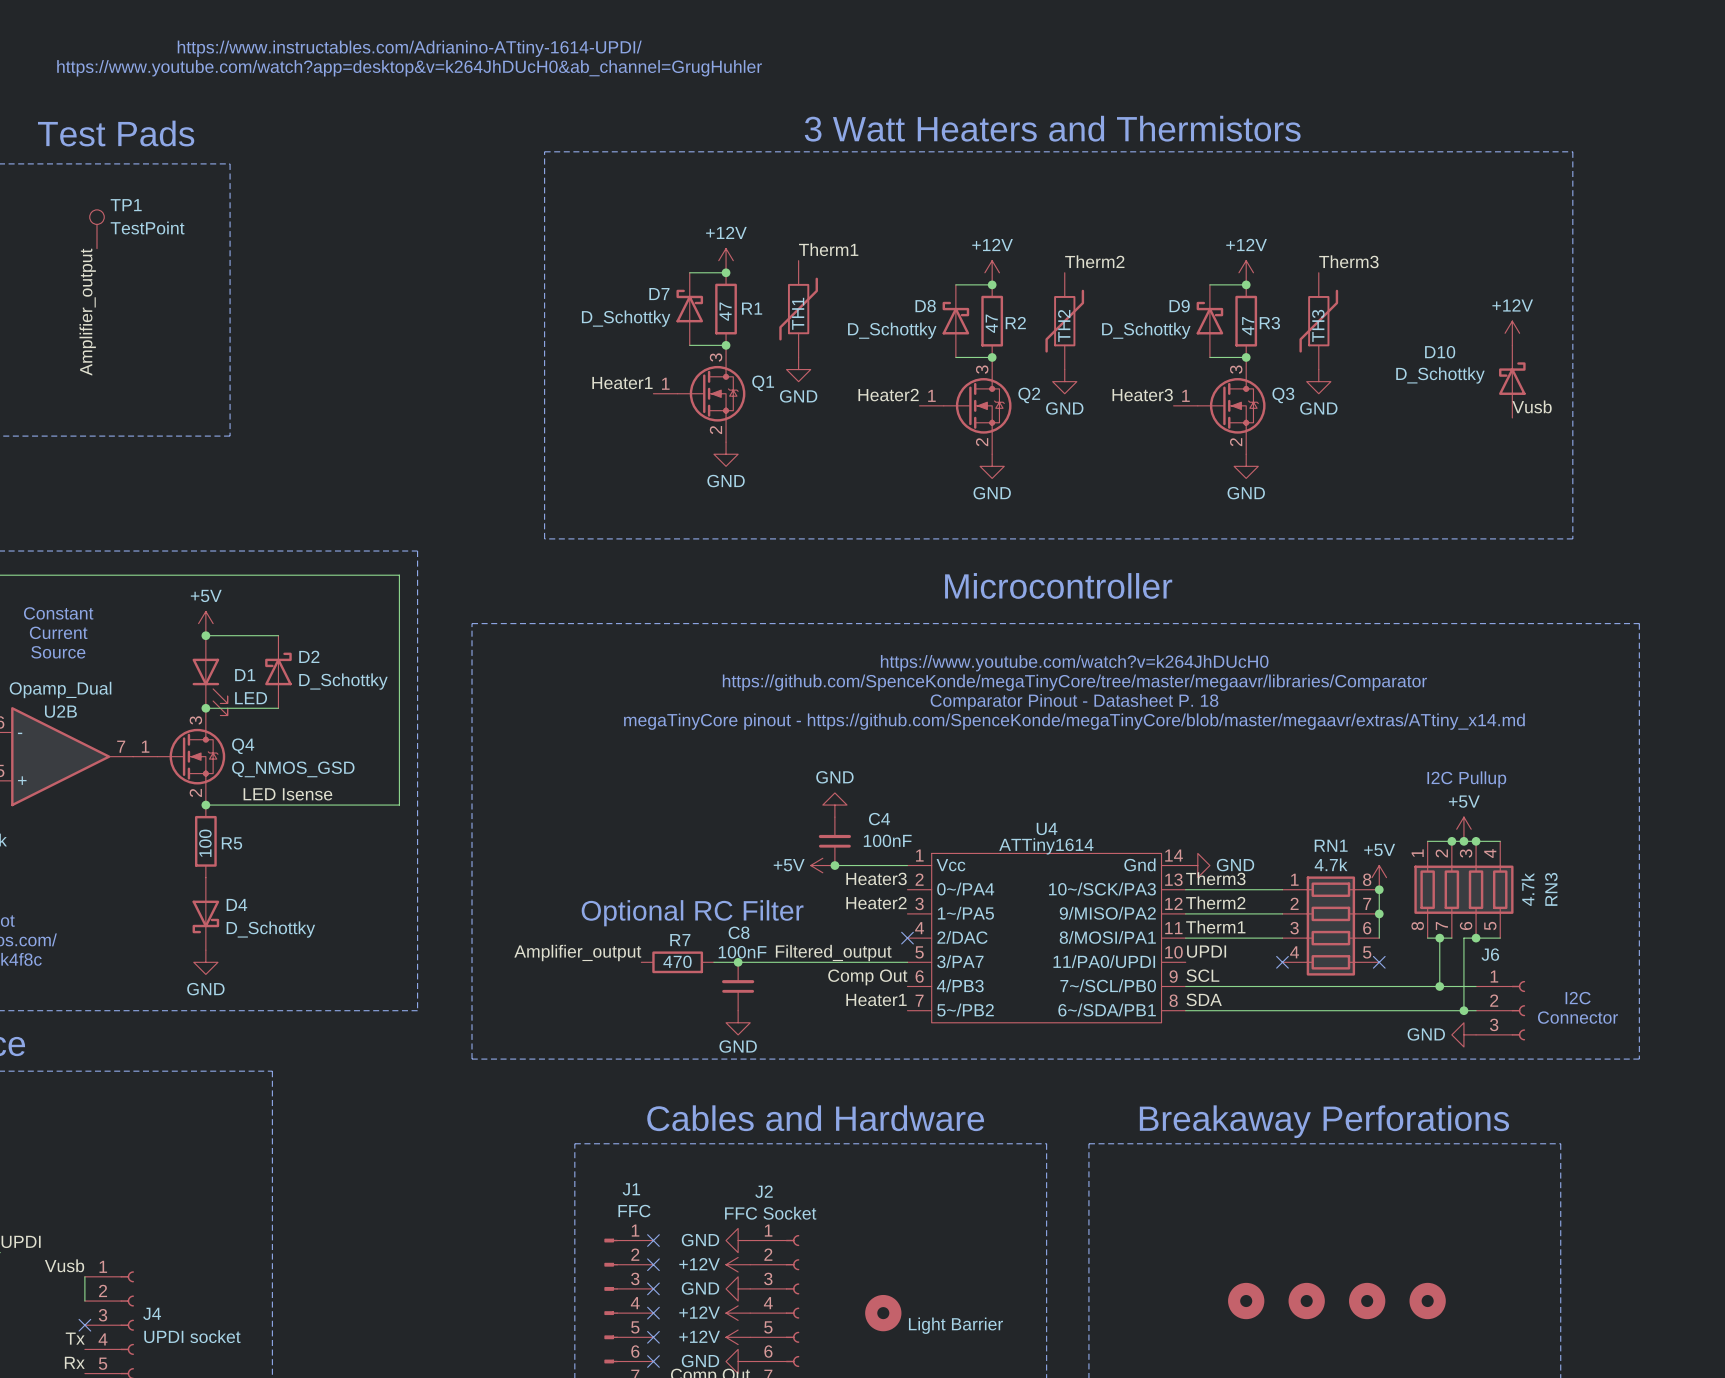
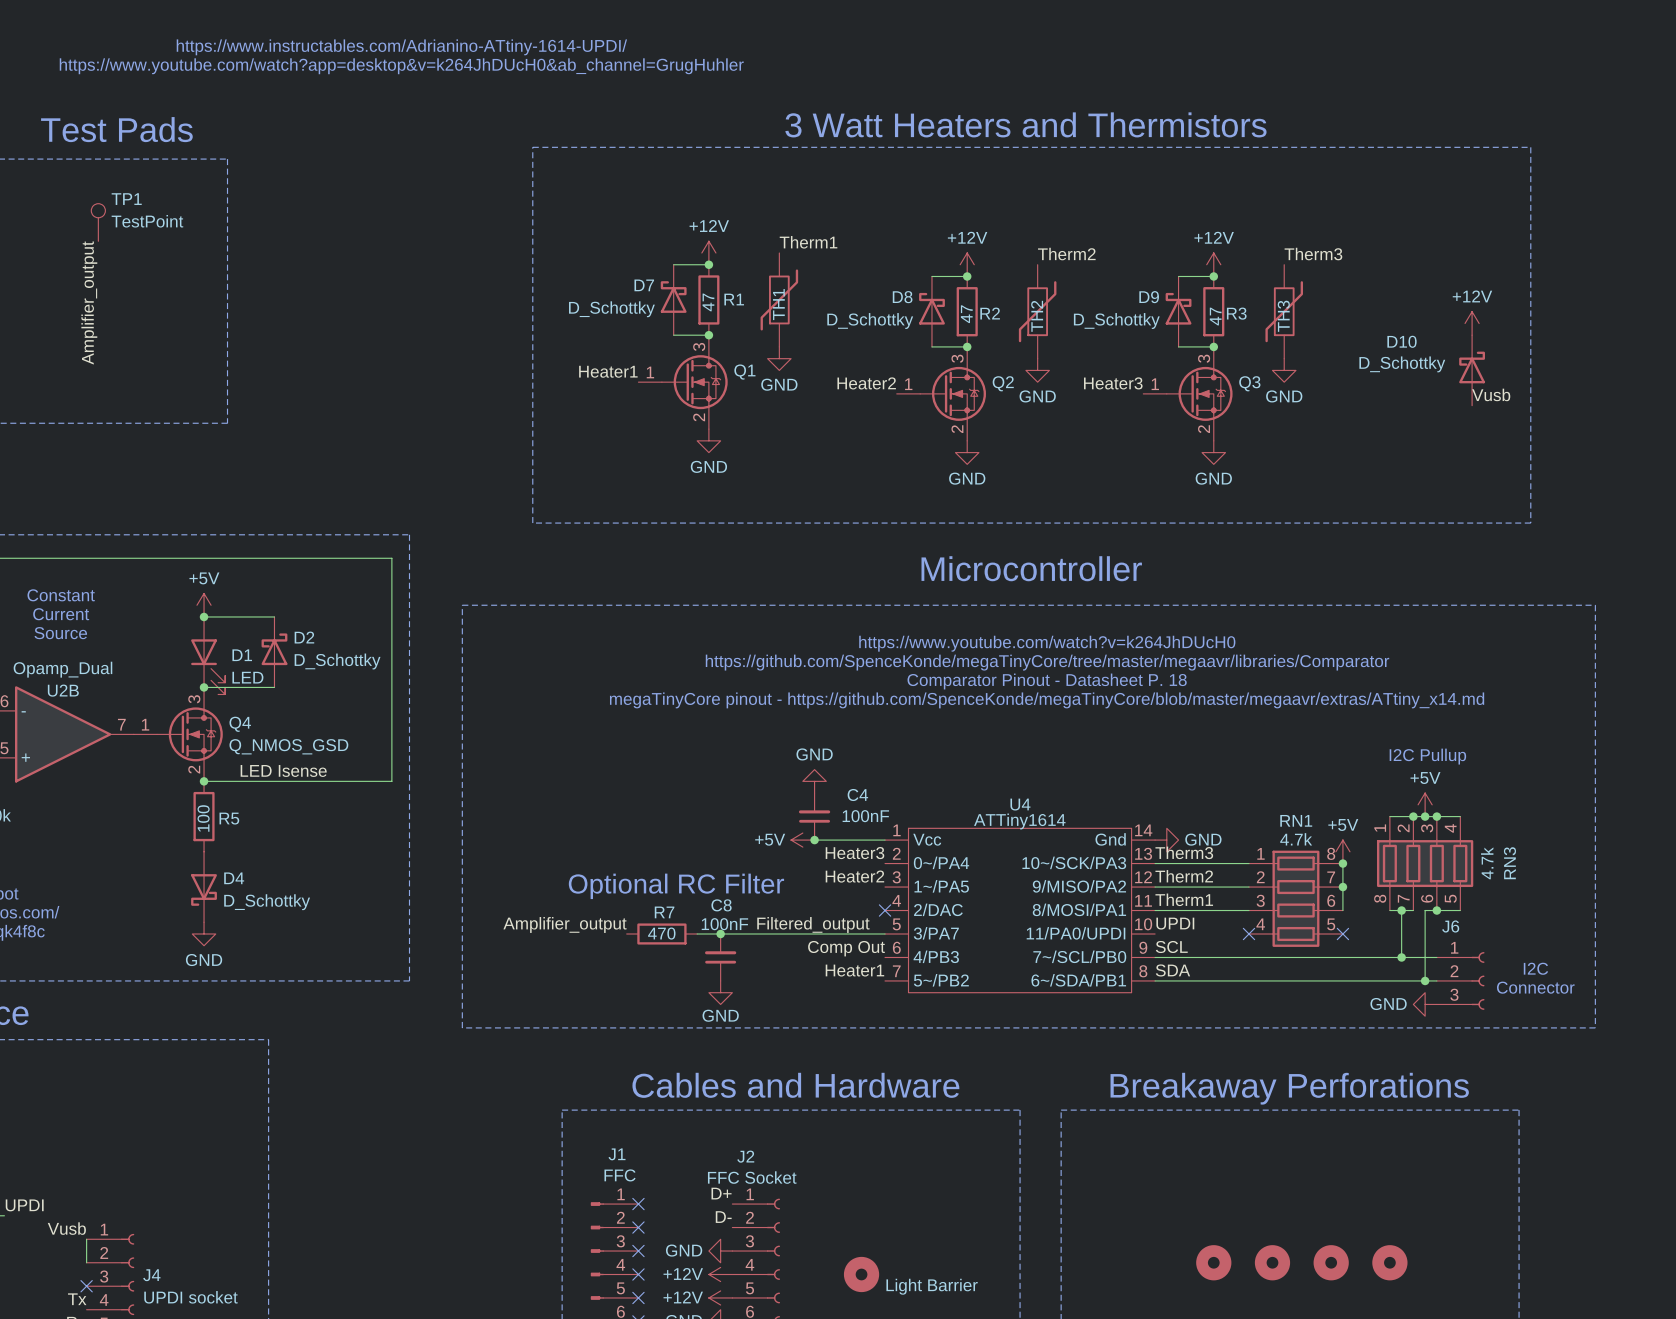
label: none -> D+ (721, 1193)
power symbol: GND (738, 1240) -> none
label: none -> D- (723, 1217)
power symbol: +12V (738, 1264) -> none

